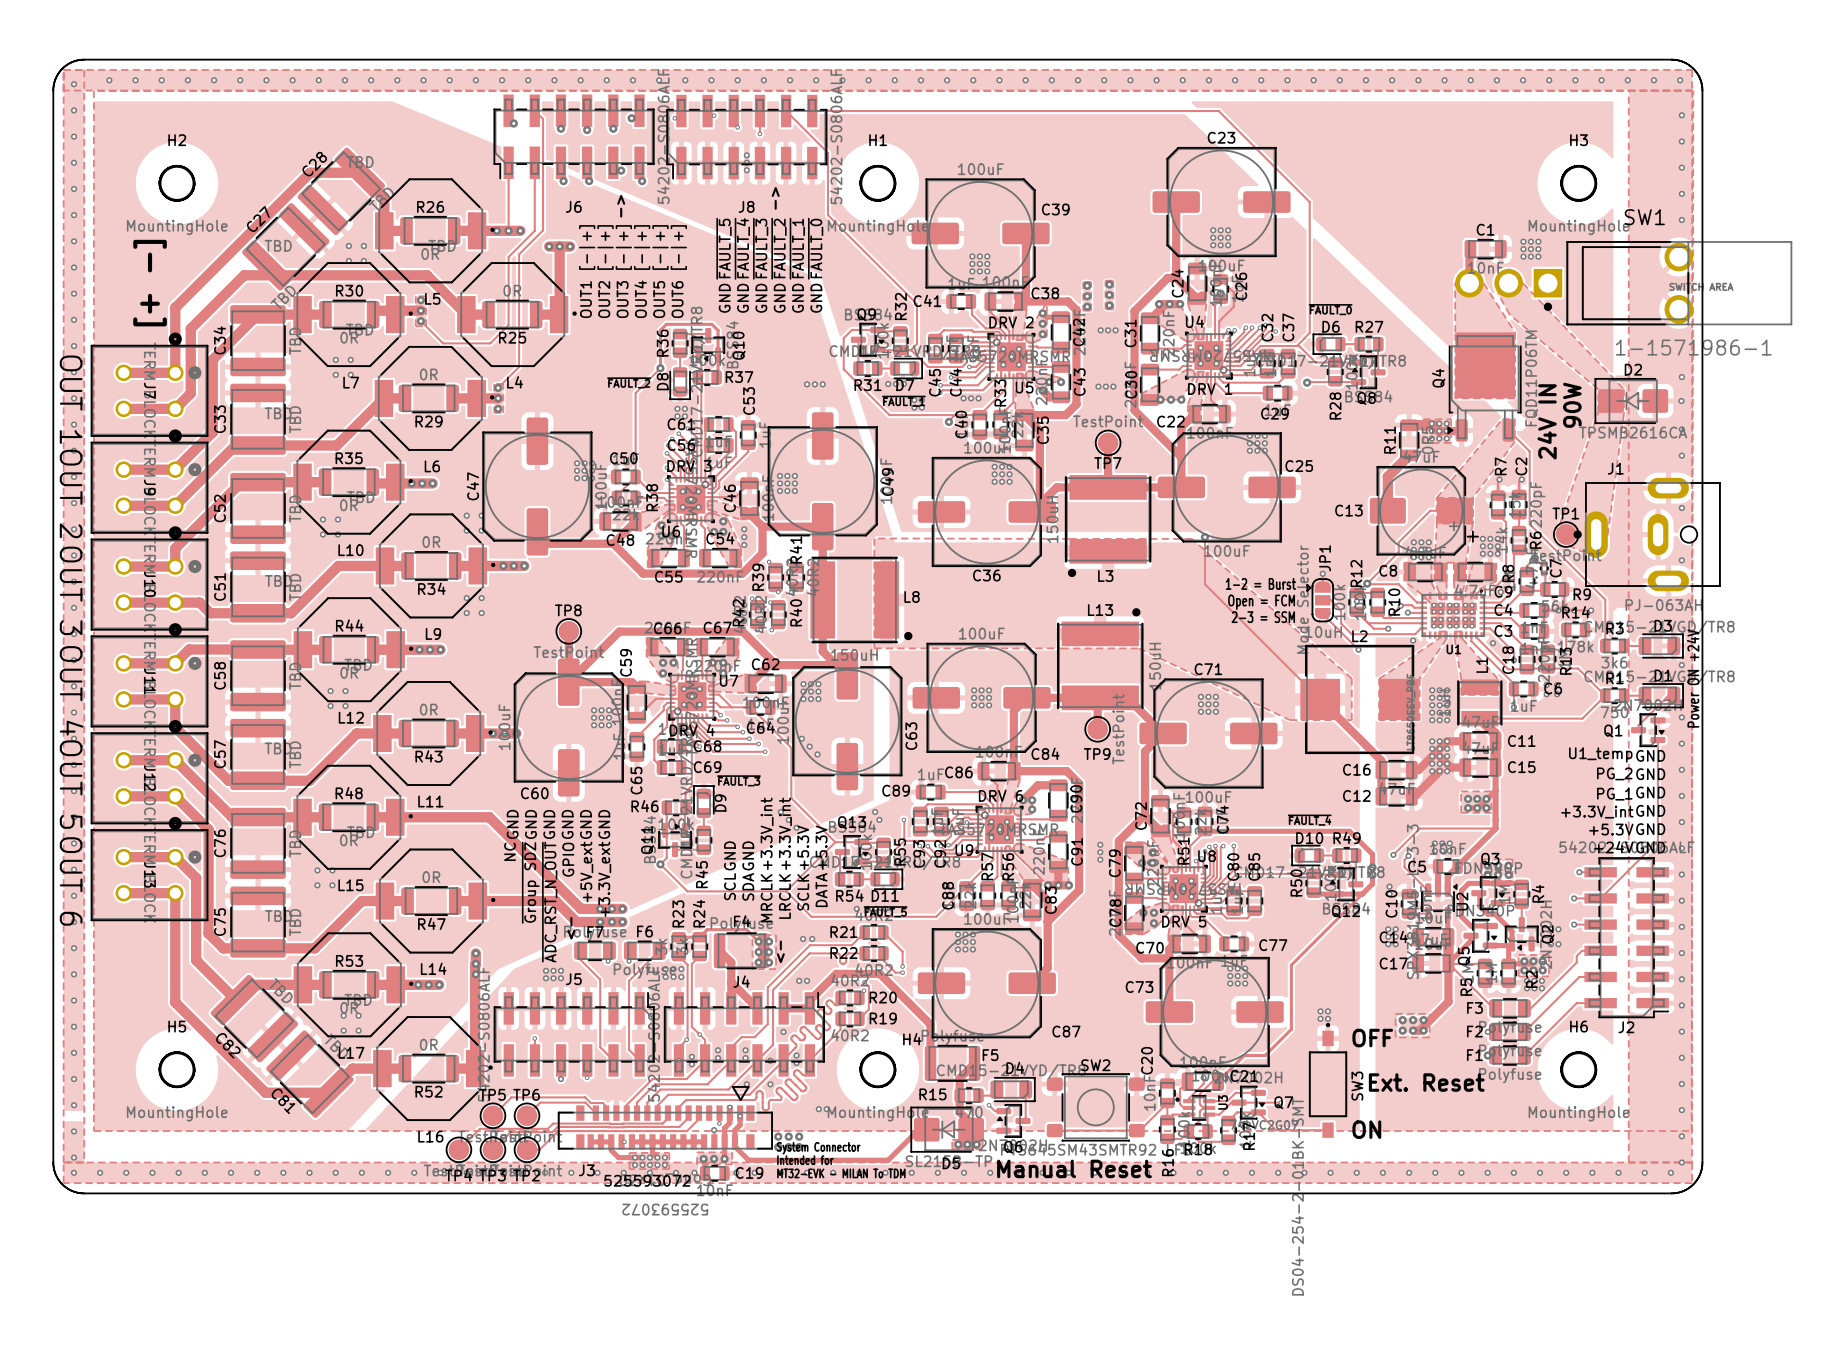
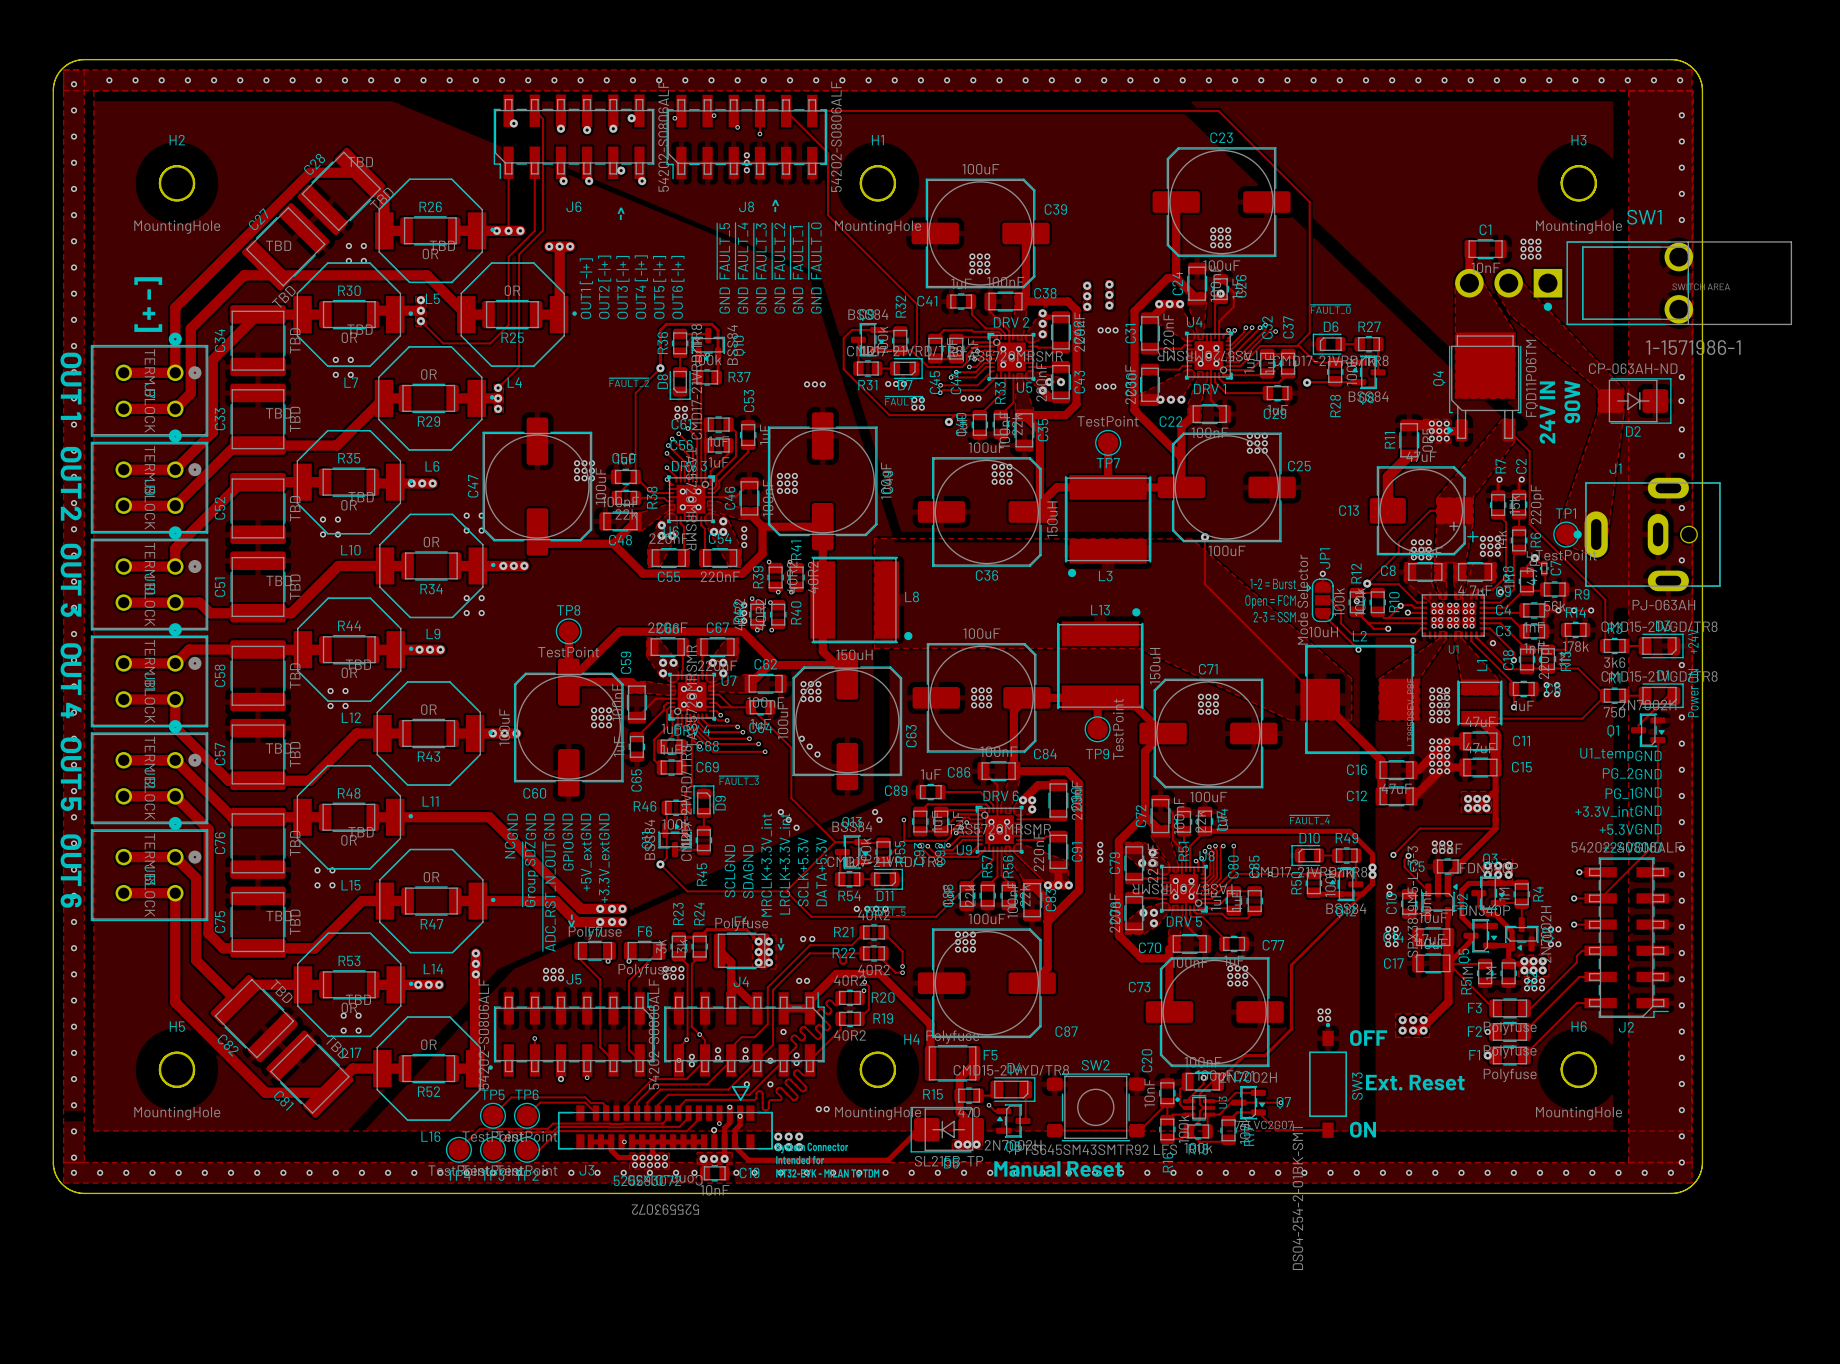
D2 rotation: 0° (1631, 401) -> 180° (1634, 401)
D2 value: TPSMB2616CA (1633, 432) -> CP-063AH-ND (1633, 368)

